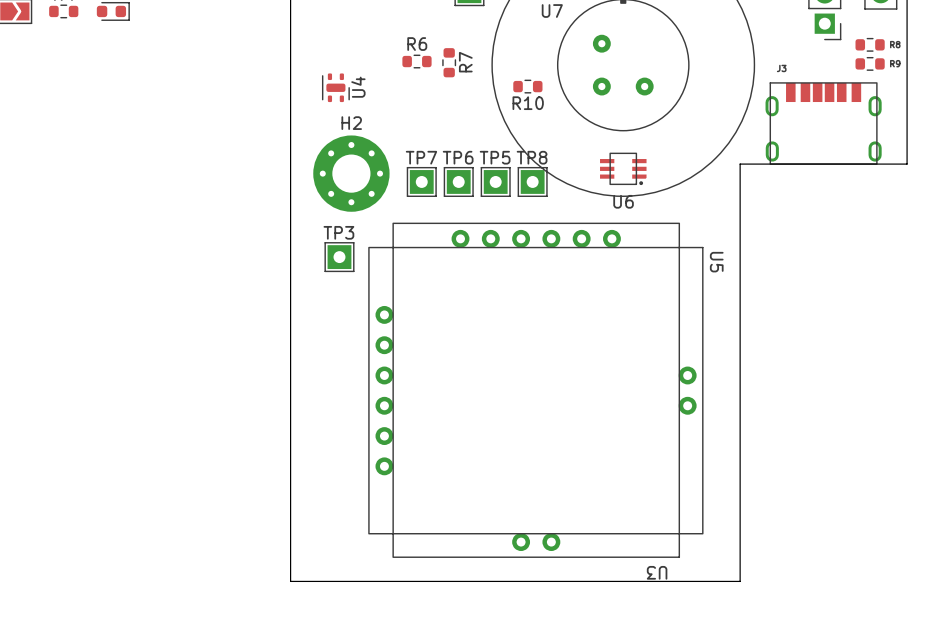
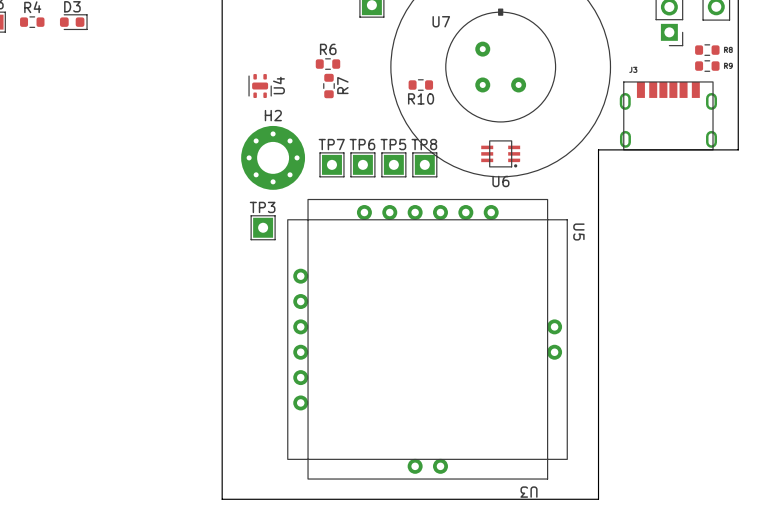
R7 position: (449, 62) -> (328, 86)

